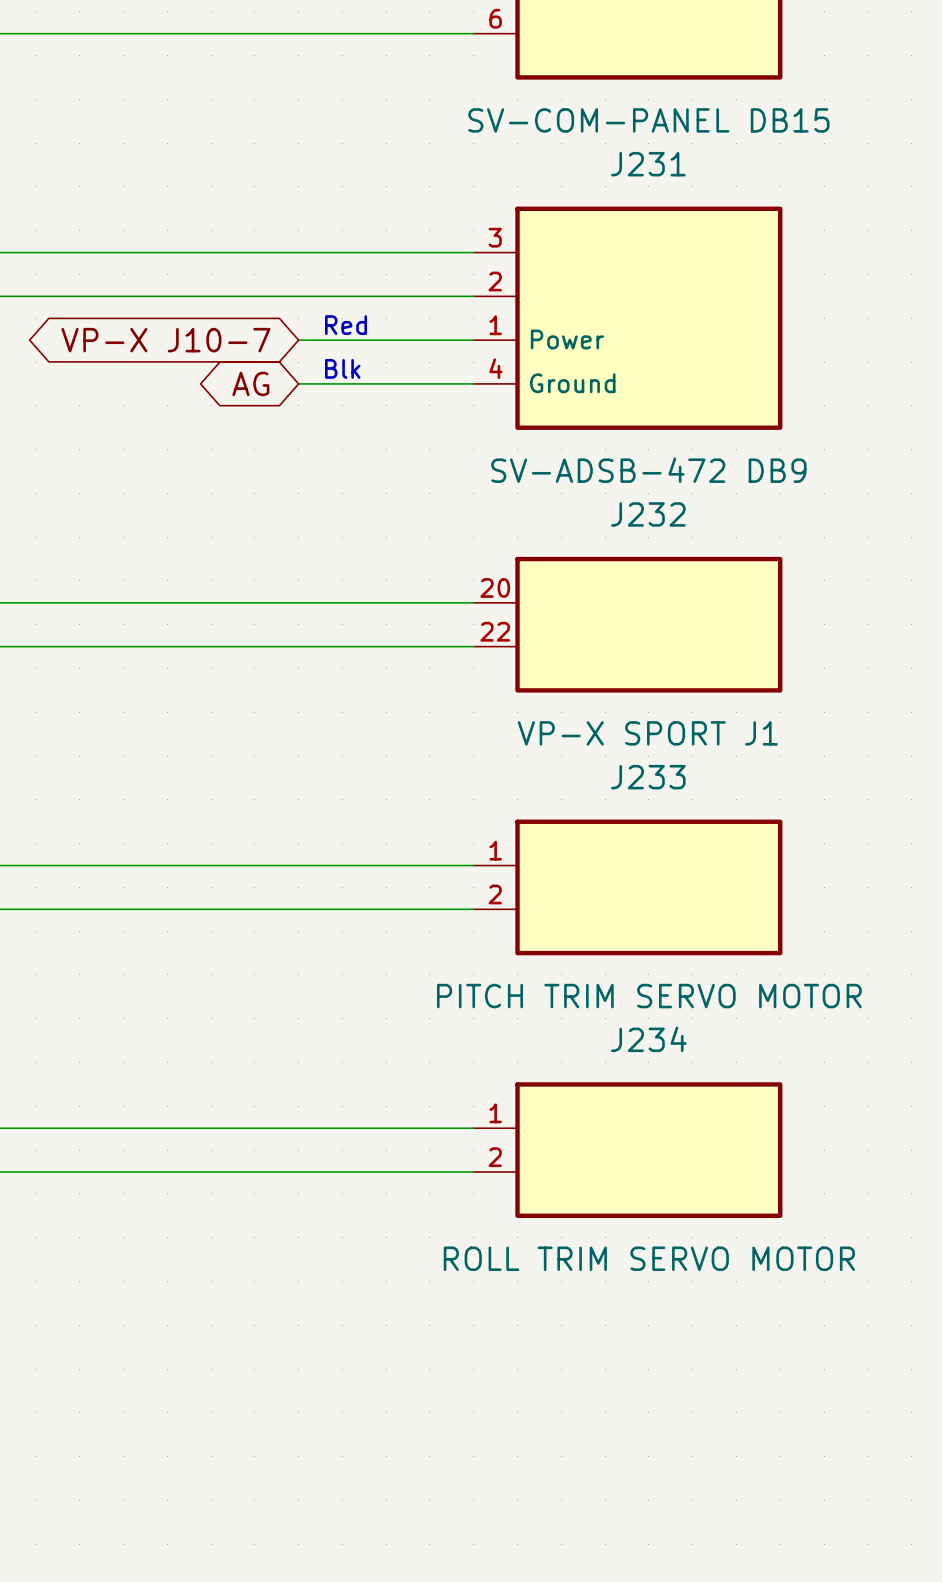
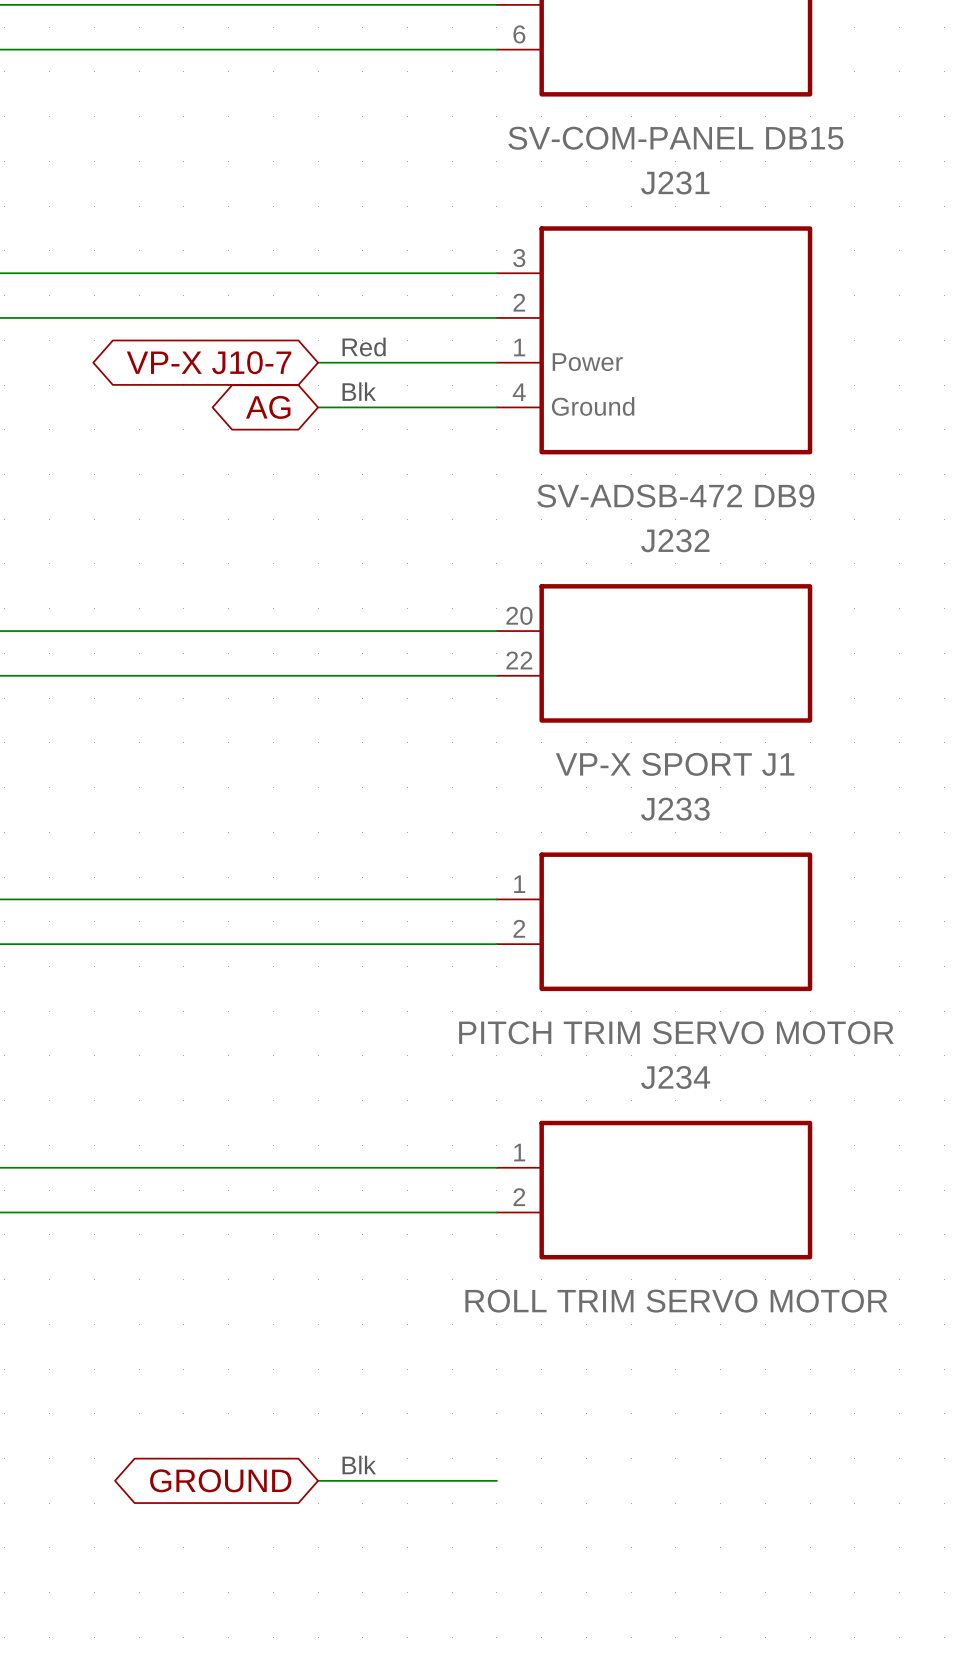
text: none -> Blk (359, 1465)
global label: none -> GROUND (220, 1480)
wire: none -> (318, 1480) (496, 1480)

